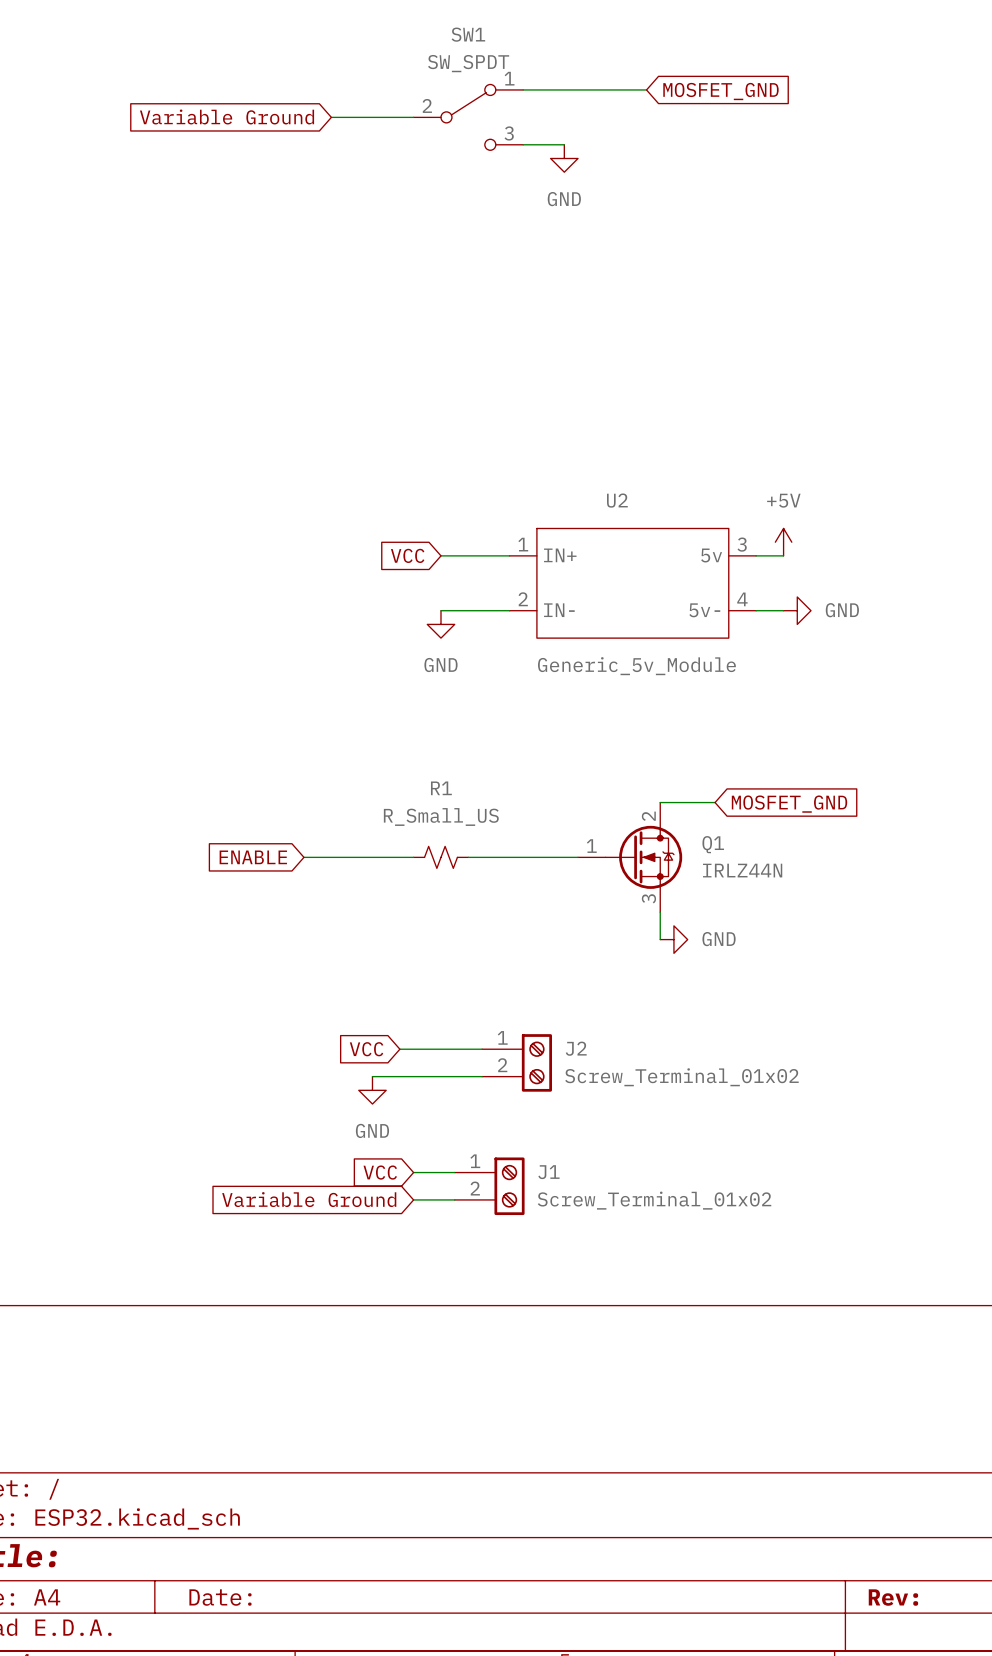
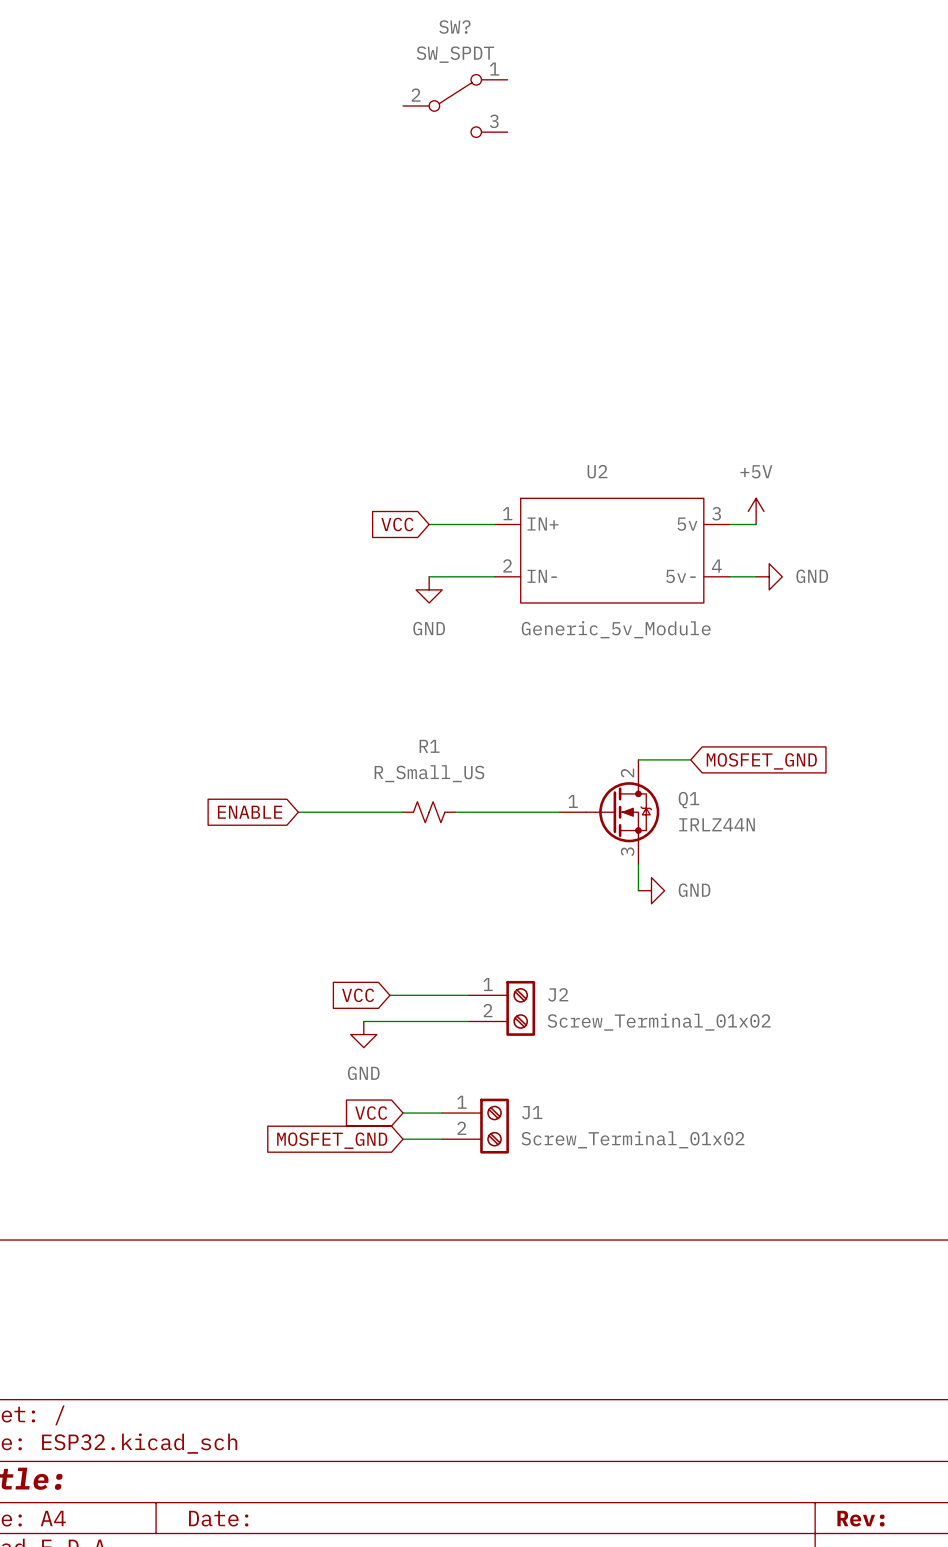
SW1 name: SW1 (468, 34) -> SW? (454, 27)
wire: (523, 89) (646, 89) -> none
global label: MOSFET_GND (720, 91) -> none
global label: Variable Ground (227, 117) -> none
wire: (331, 117) (413, 117) -> none
wire: (523, 144) (564, 144) -> none
power symbol: GND (564, 158) -> none
global label: Variable Ground (309, 1199) -> MOSFET_GND (332, 1140)

